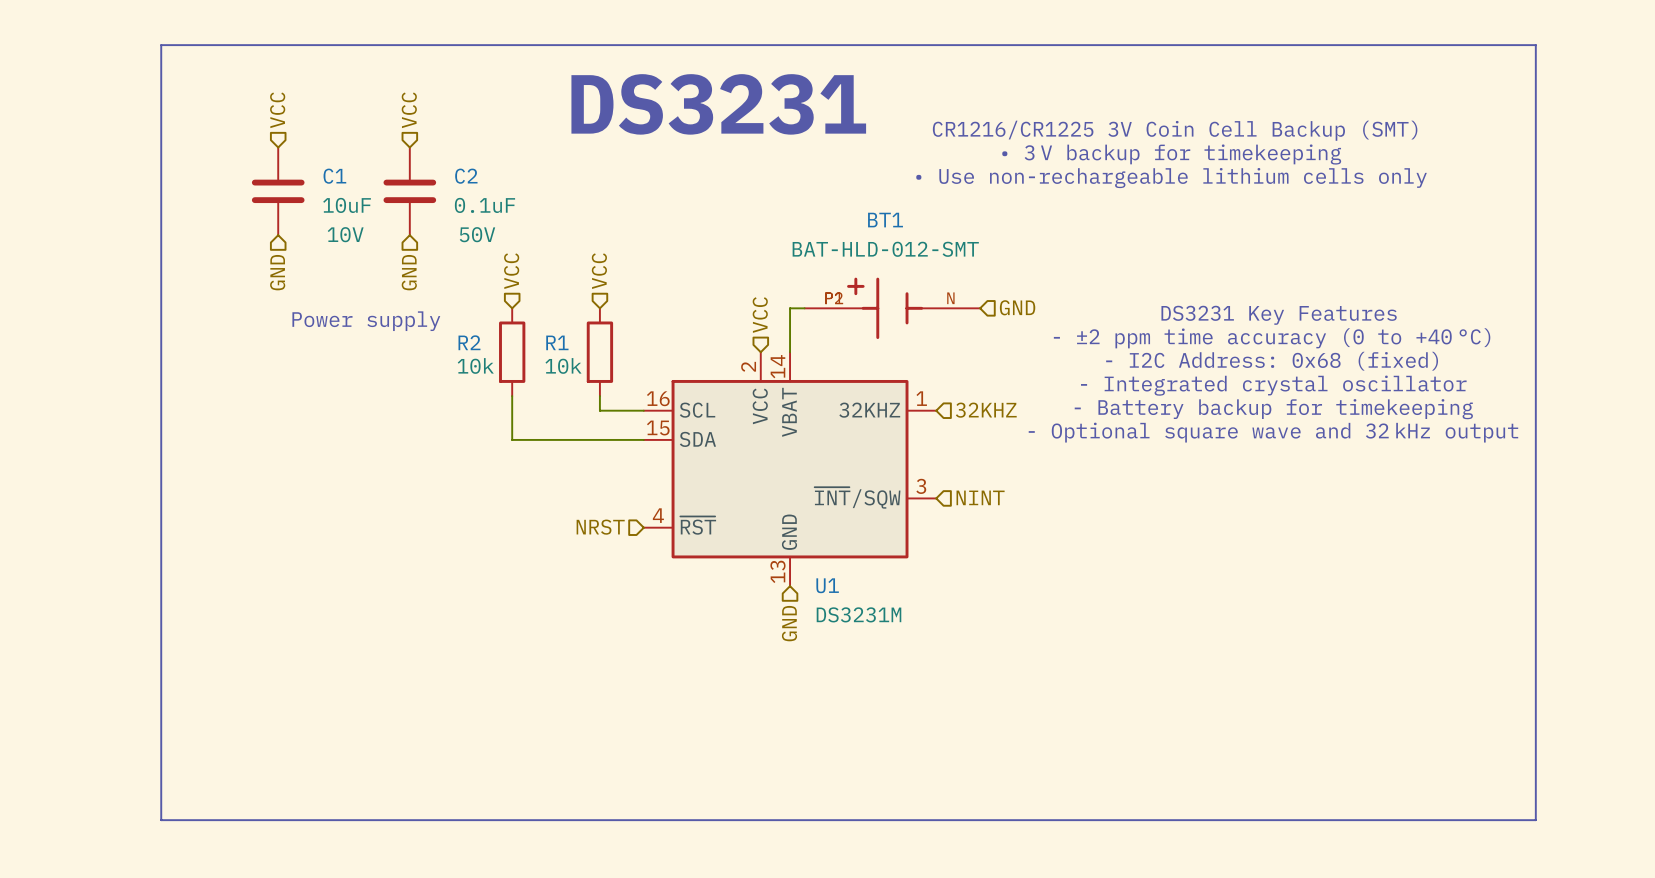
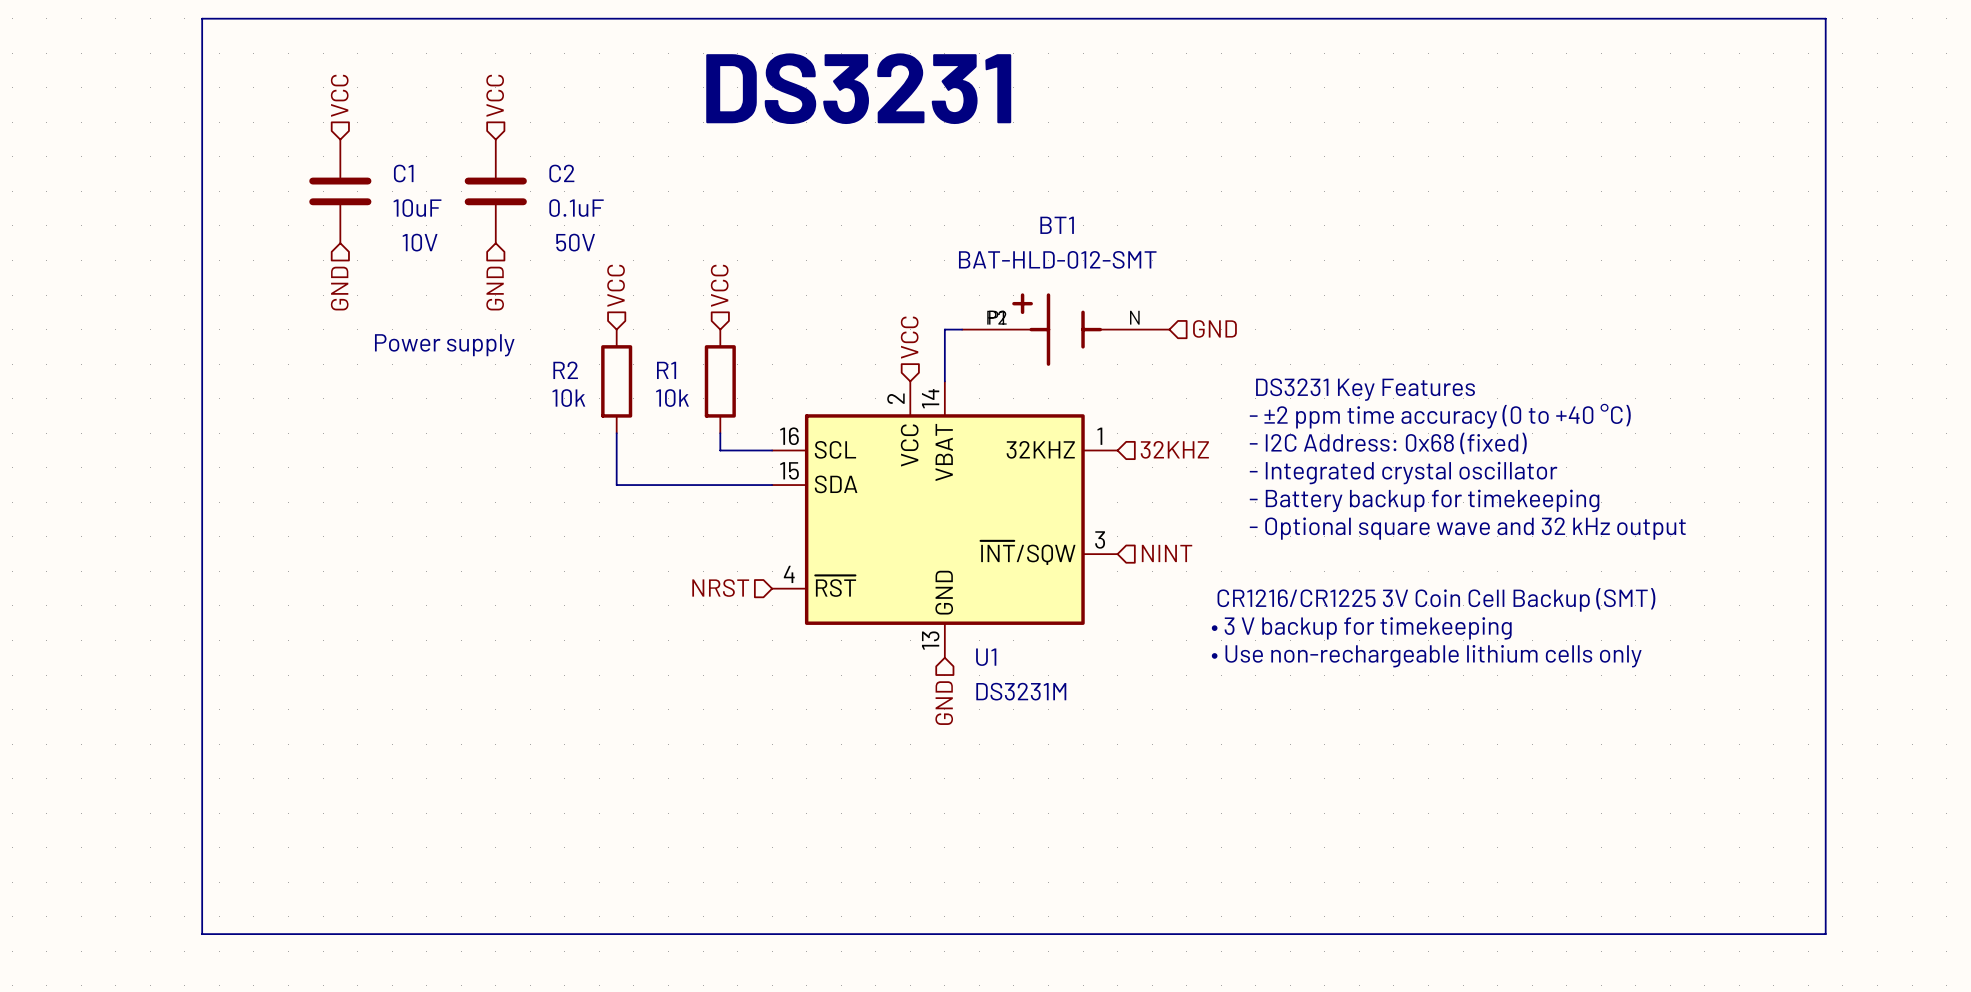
text: CR1216/CR1225 3V Coin Cell Backup (SMT) (1175, 130) -> none
text: • 3 V backup for timekeeping (1171, 154) -> none
text: • Use non-rechargeable lithium cells only (1171, 178) -> none
text position: DS3231 Key Features (1279, 315) -> DS3231 Key Features (1365, 389)
text position: - ±2 ppm time accuracy (0 to +40 °C) (1272, 338) -> - ±2 ppm time accuracy (0 to +40 °C) (1440, 416)
text position: - I2C Address: 0x68 (fixed) (1272, 361) -> - I2C Address: 0x68 (fixed) (1388, 443)
text position: - Integrated crystal oscillator (1273, 385) -> - Integrated crystal oscillator (1403, 473)
text position: - Battery backup for timekeeping (1273, 409) -> - Battery backup for timekeeping (1424, 500)
text position: - Optional square wave and 32 kHz output (1273, 432) -> - Optional square wave and 32 kHz output (1467, 528)
text: none -> CR1216/CR1225 3V Coin Cell Backup (SMT) (1436, 599)
text: none -> • 3 V backup for timekeeping (1361, 628)
text: none -> • Use non-rechargeable lithium cells only (1426, 656)

